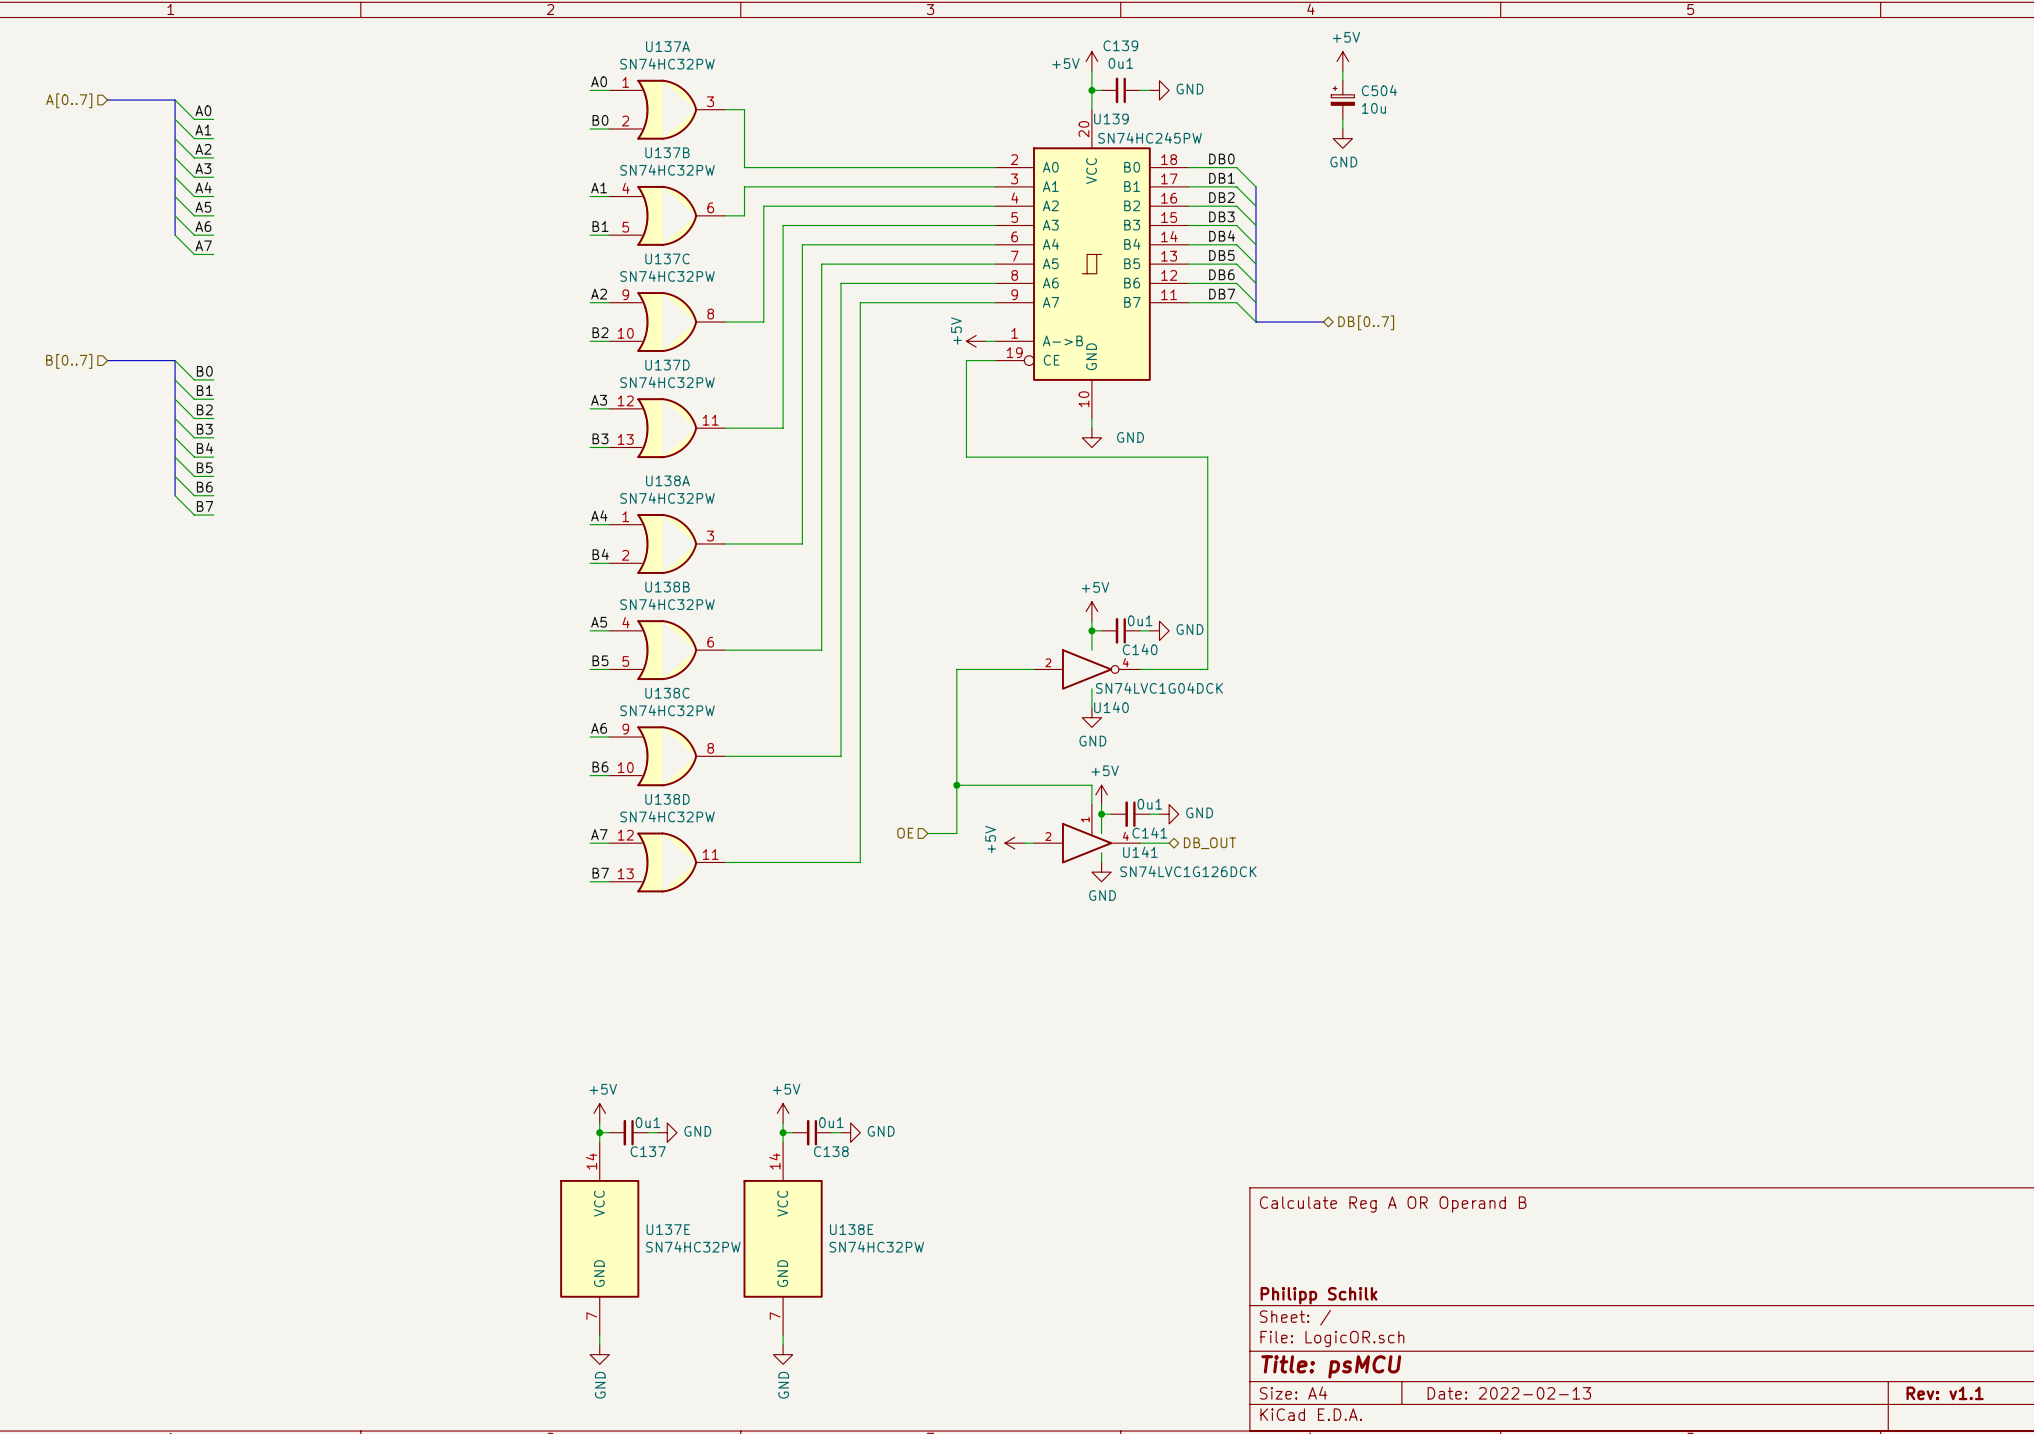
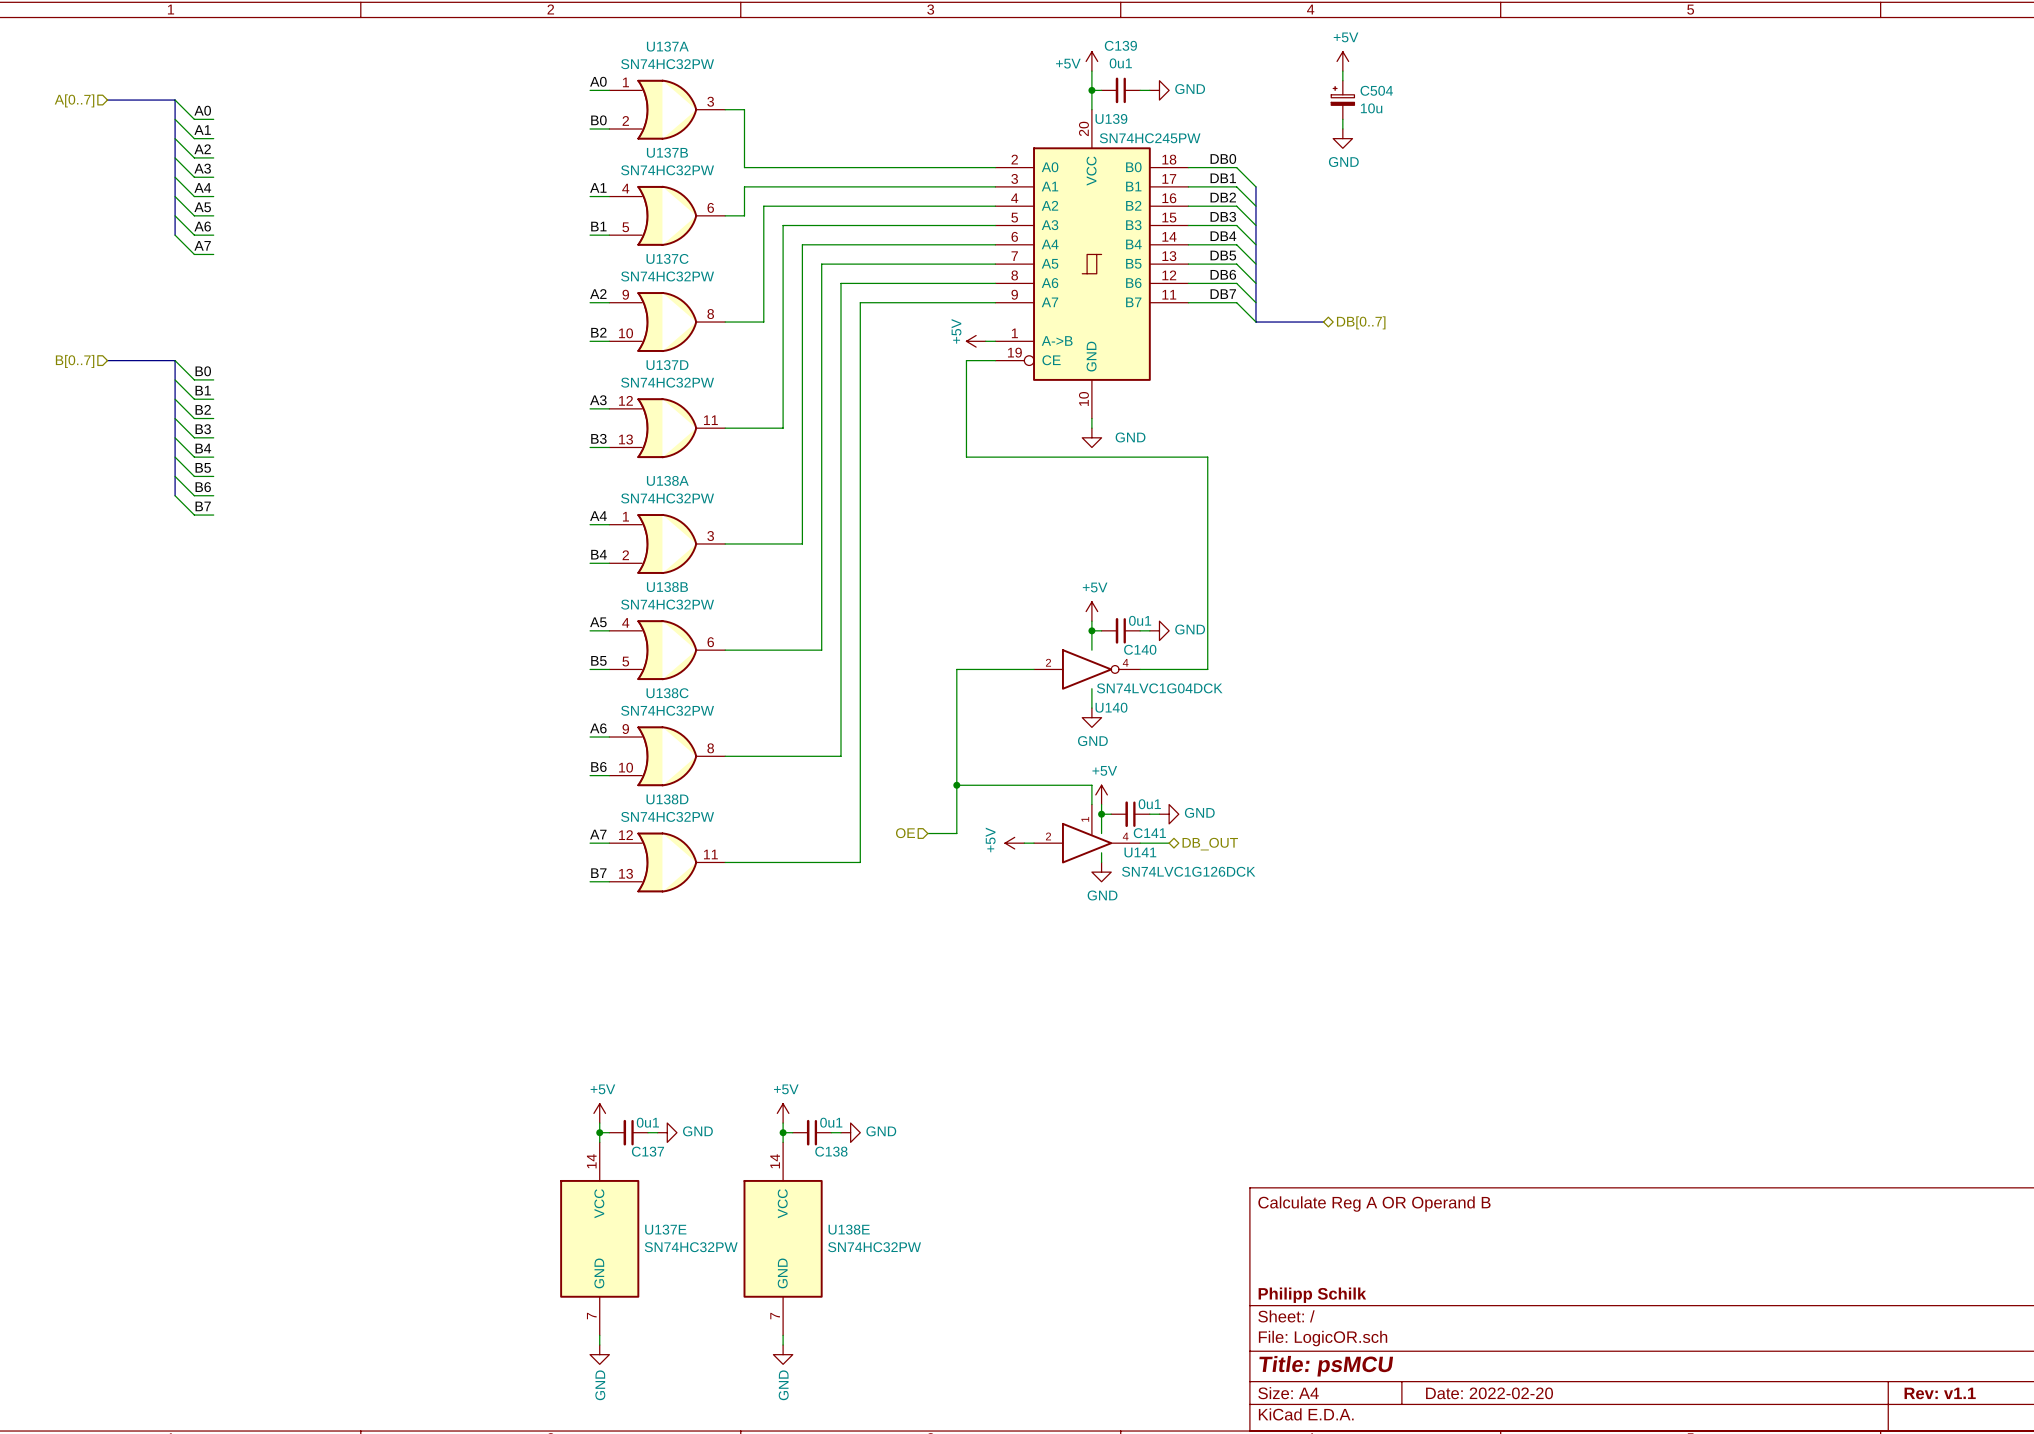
title block: Date: 2022-02-13 (1509, 1393) -> Date: 2022-02-20 (1489, 1393)

